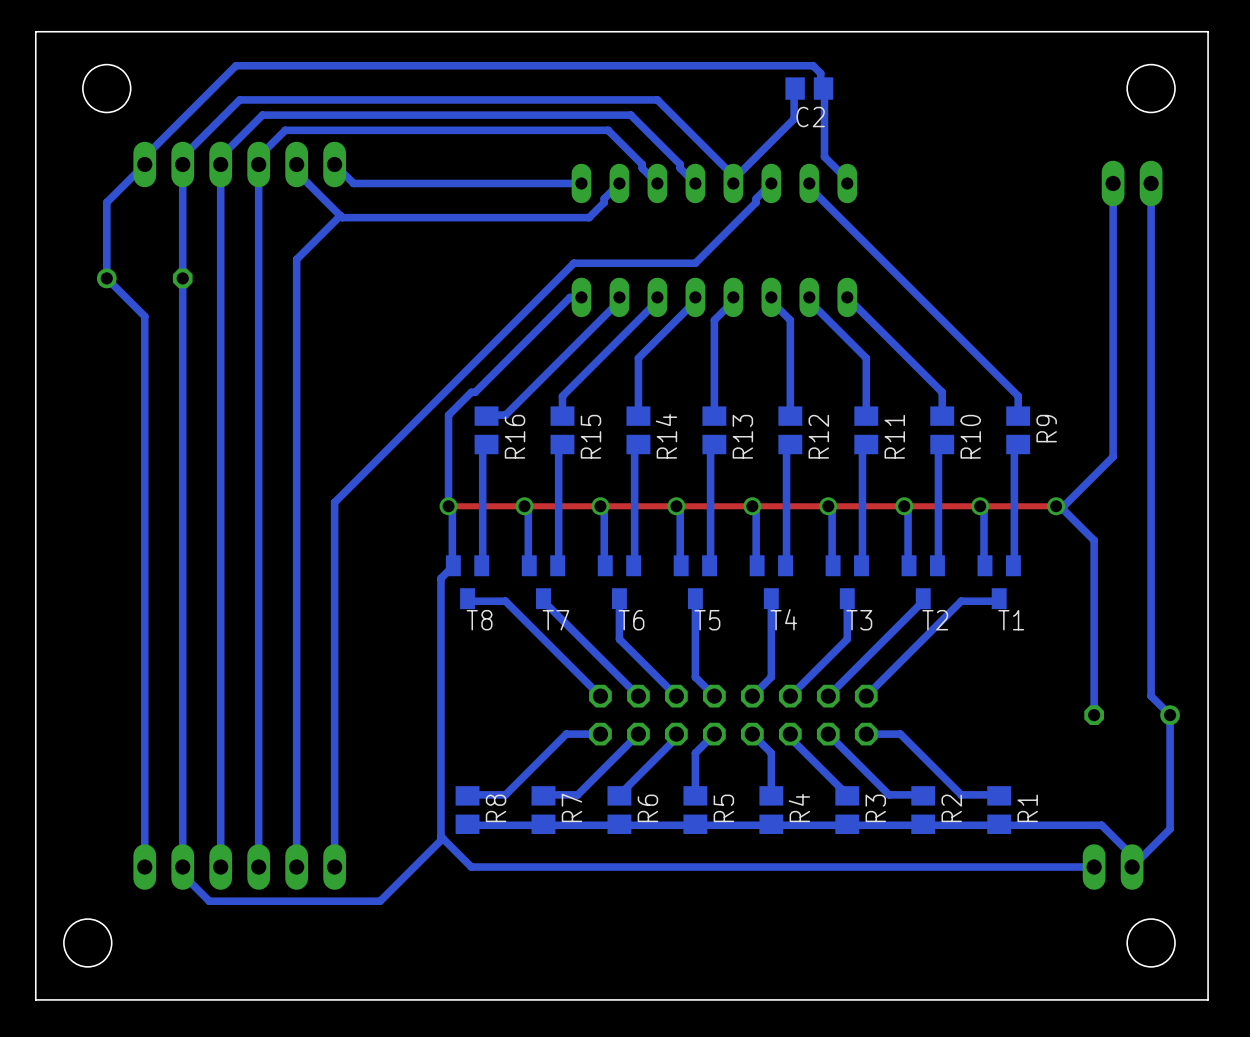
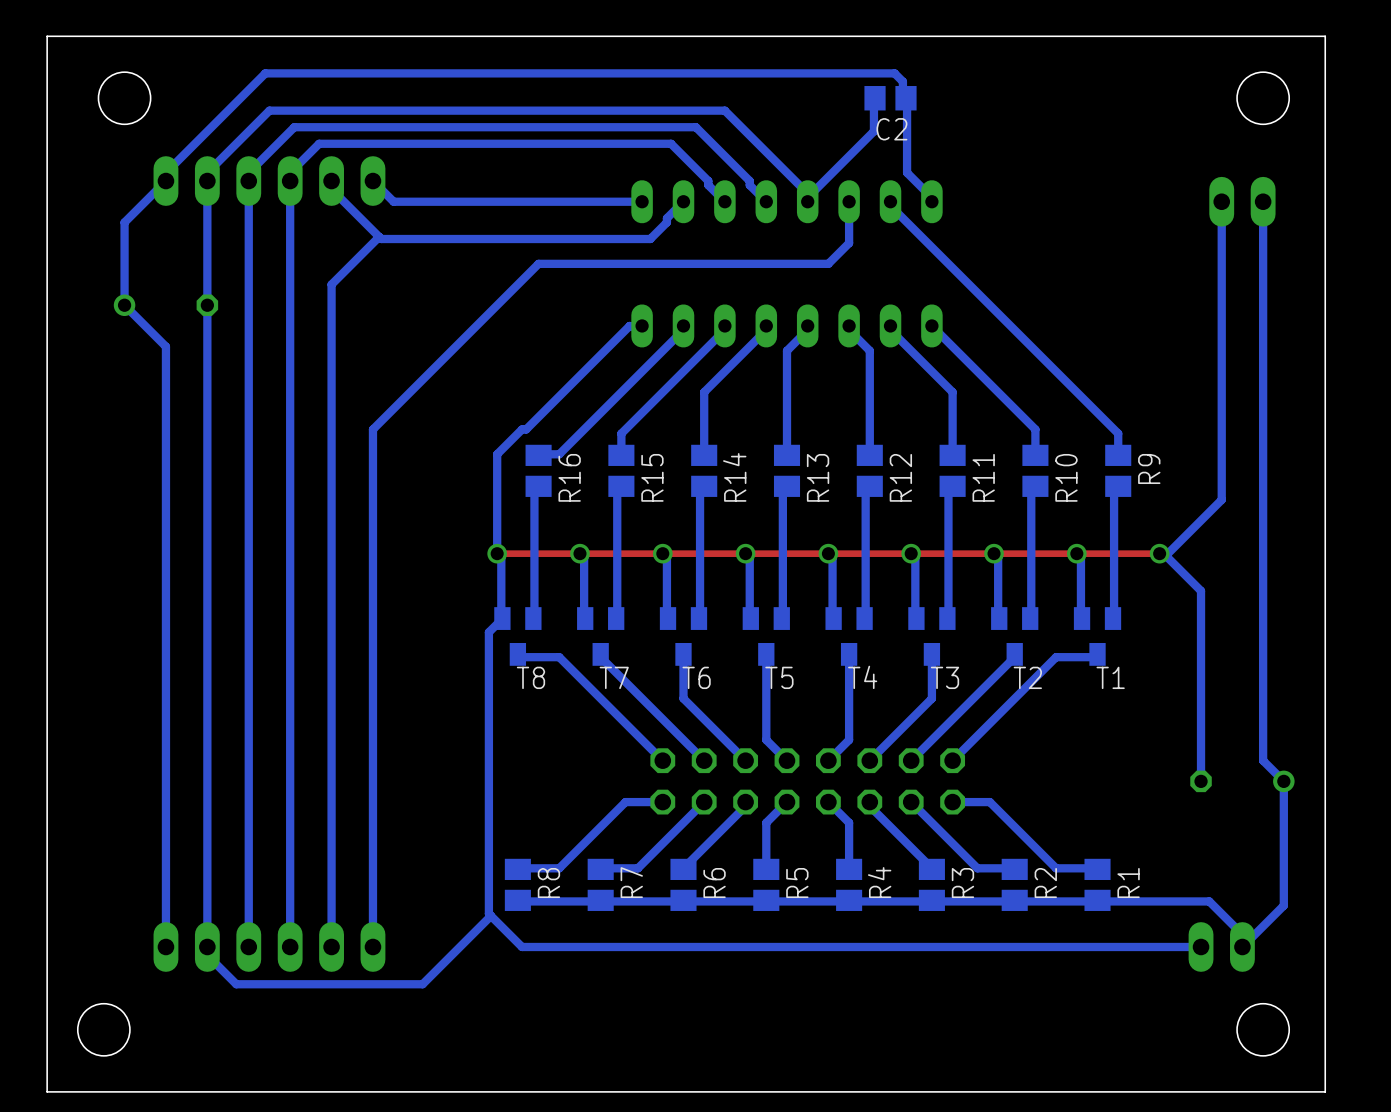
bottom track: (771, 183) (756, 198) (756, 202) (695, 263) (573, 263) (334, 502) -> (849, 201) (849, 243) (828, 263) (538, 263) (372, 429) (372, 549)

